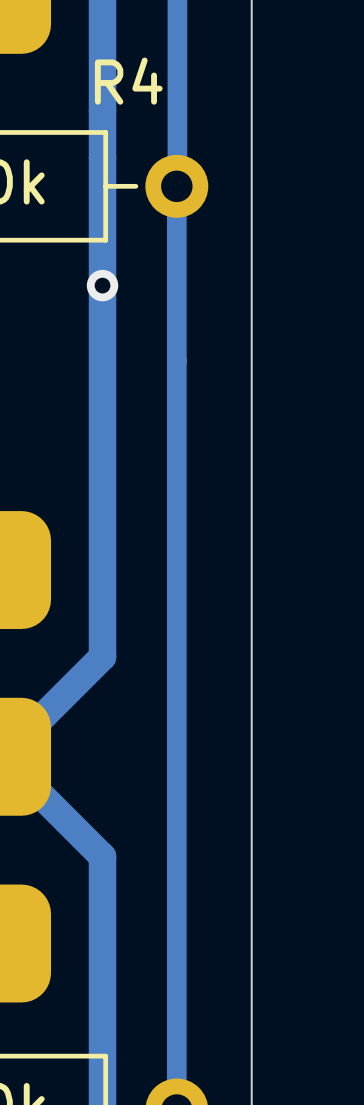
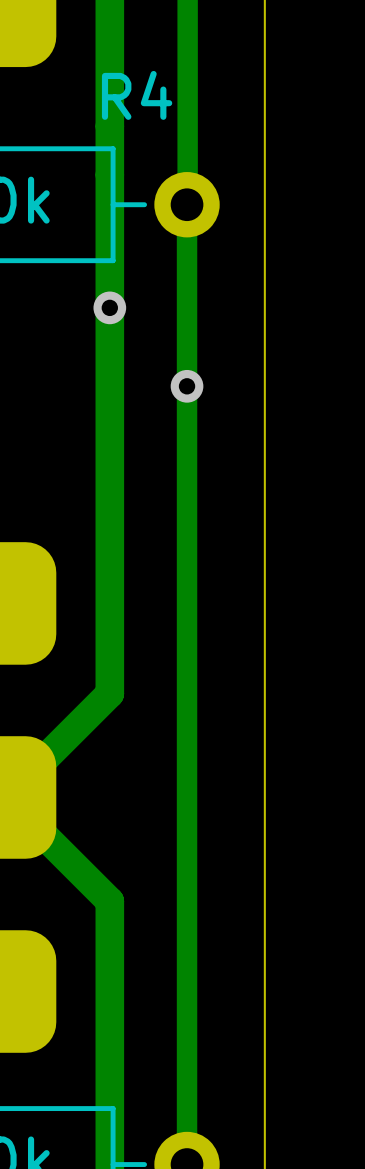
via: none -> (187, 386)

